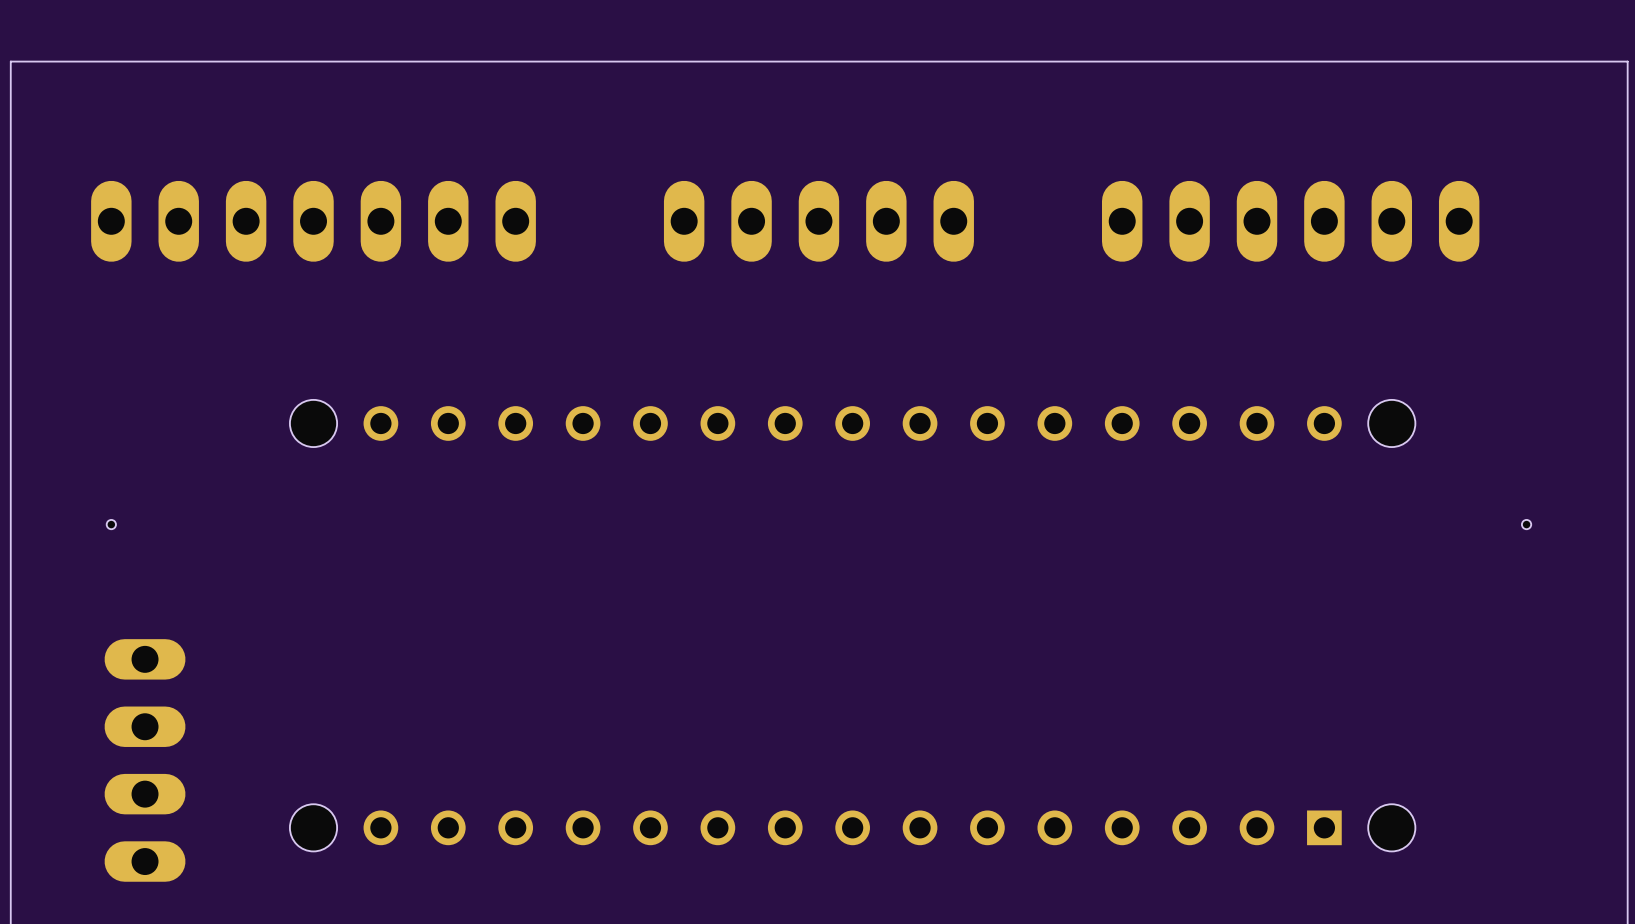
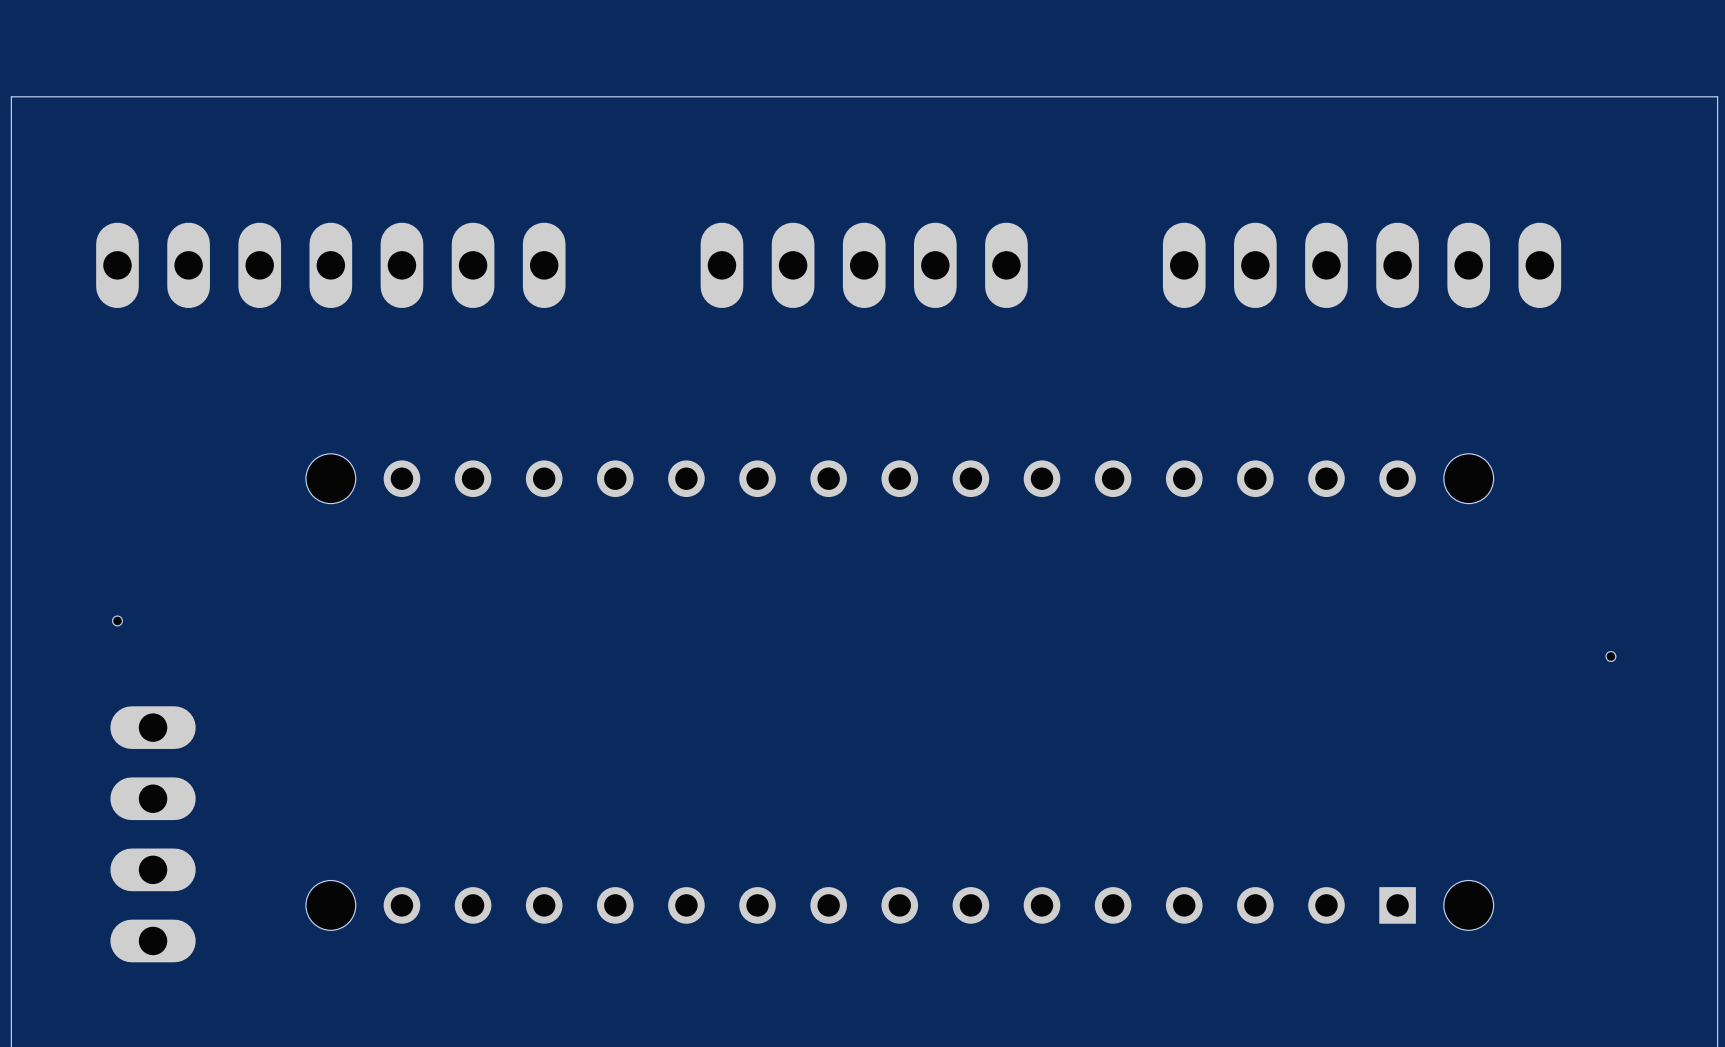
hole position: (111, 524) -> (117, 620)
hole position: (1526, 524) -> (1610, 656)

